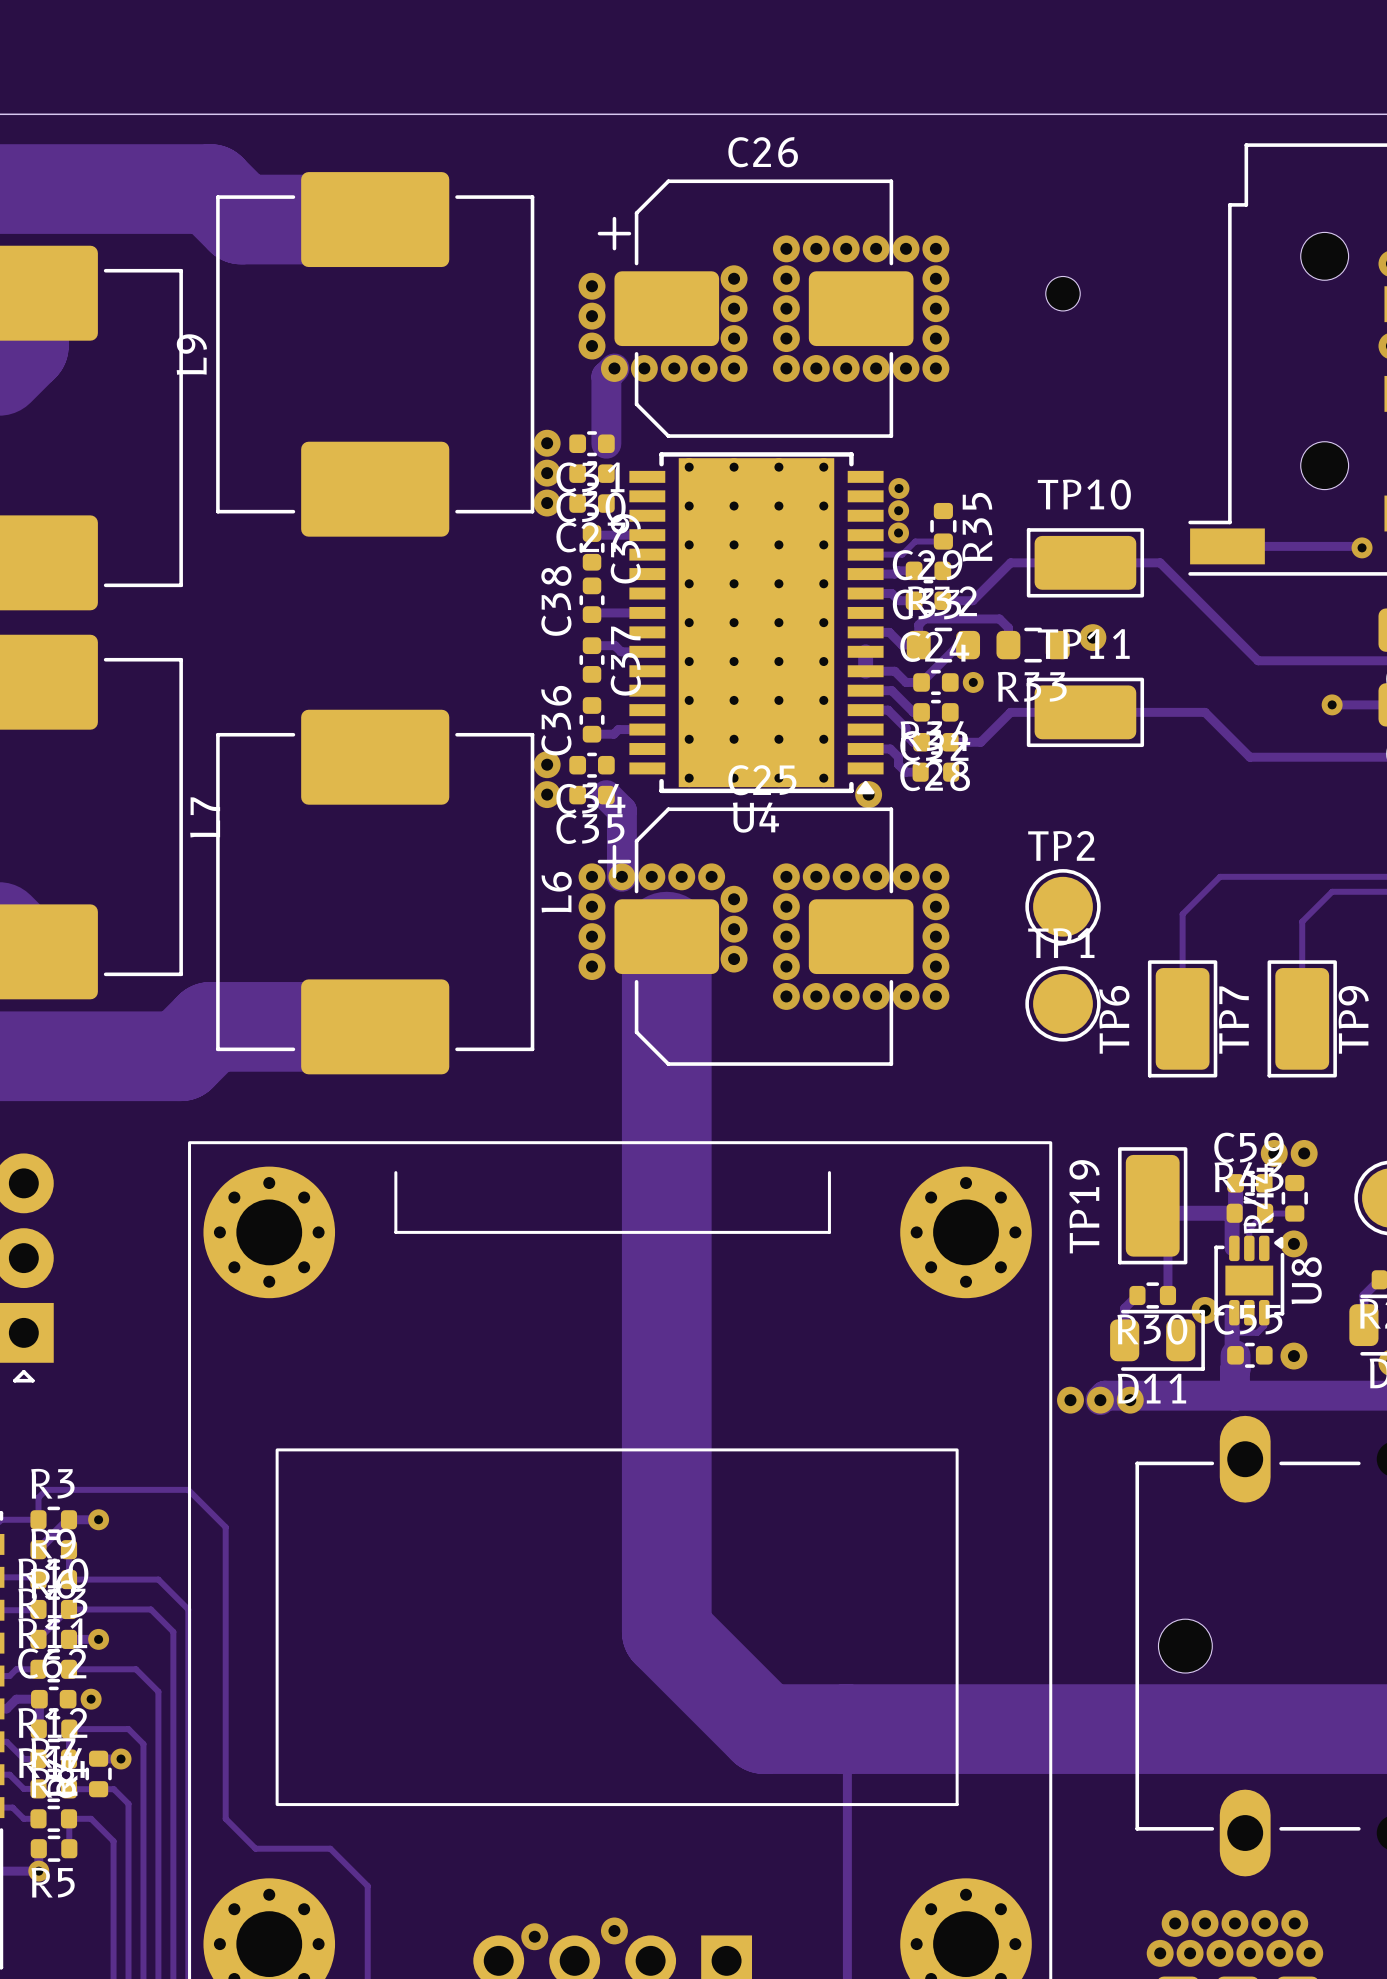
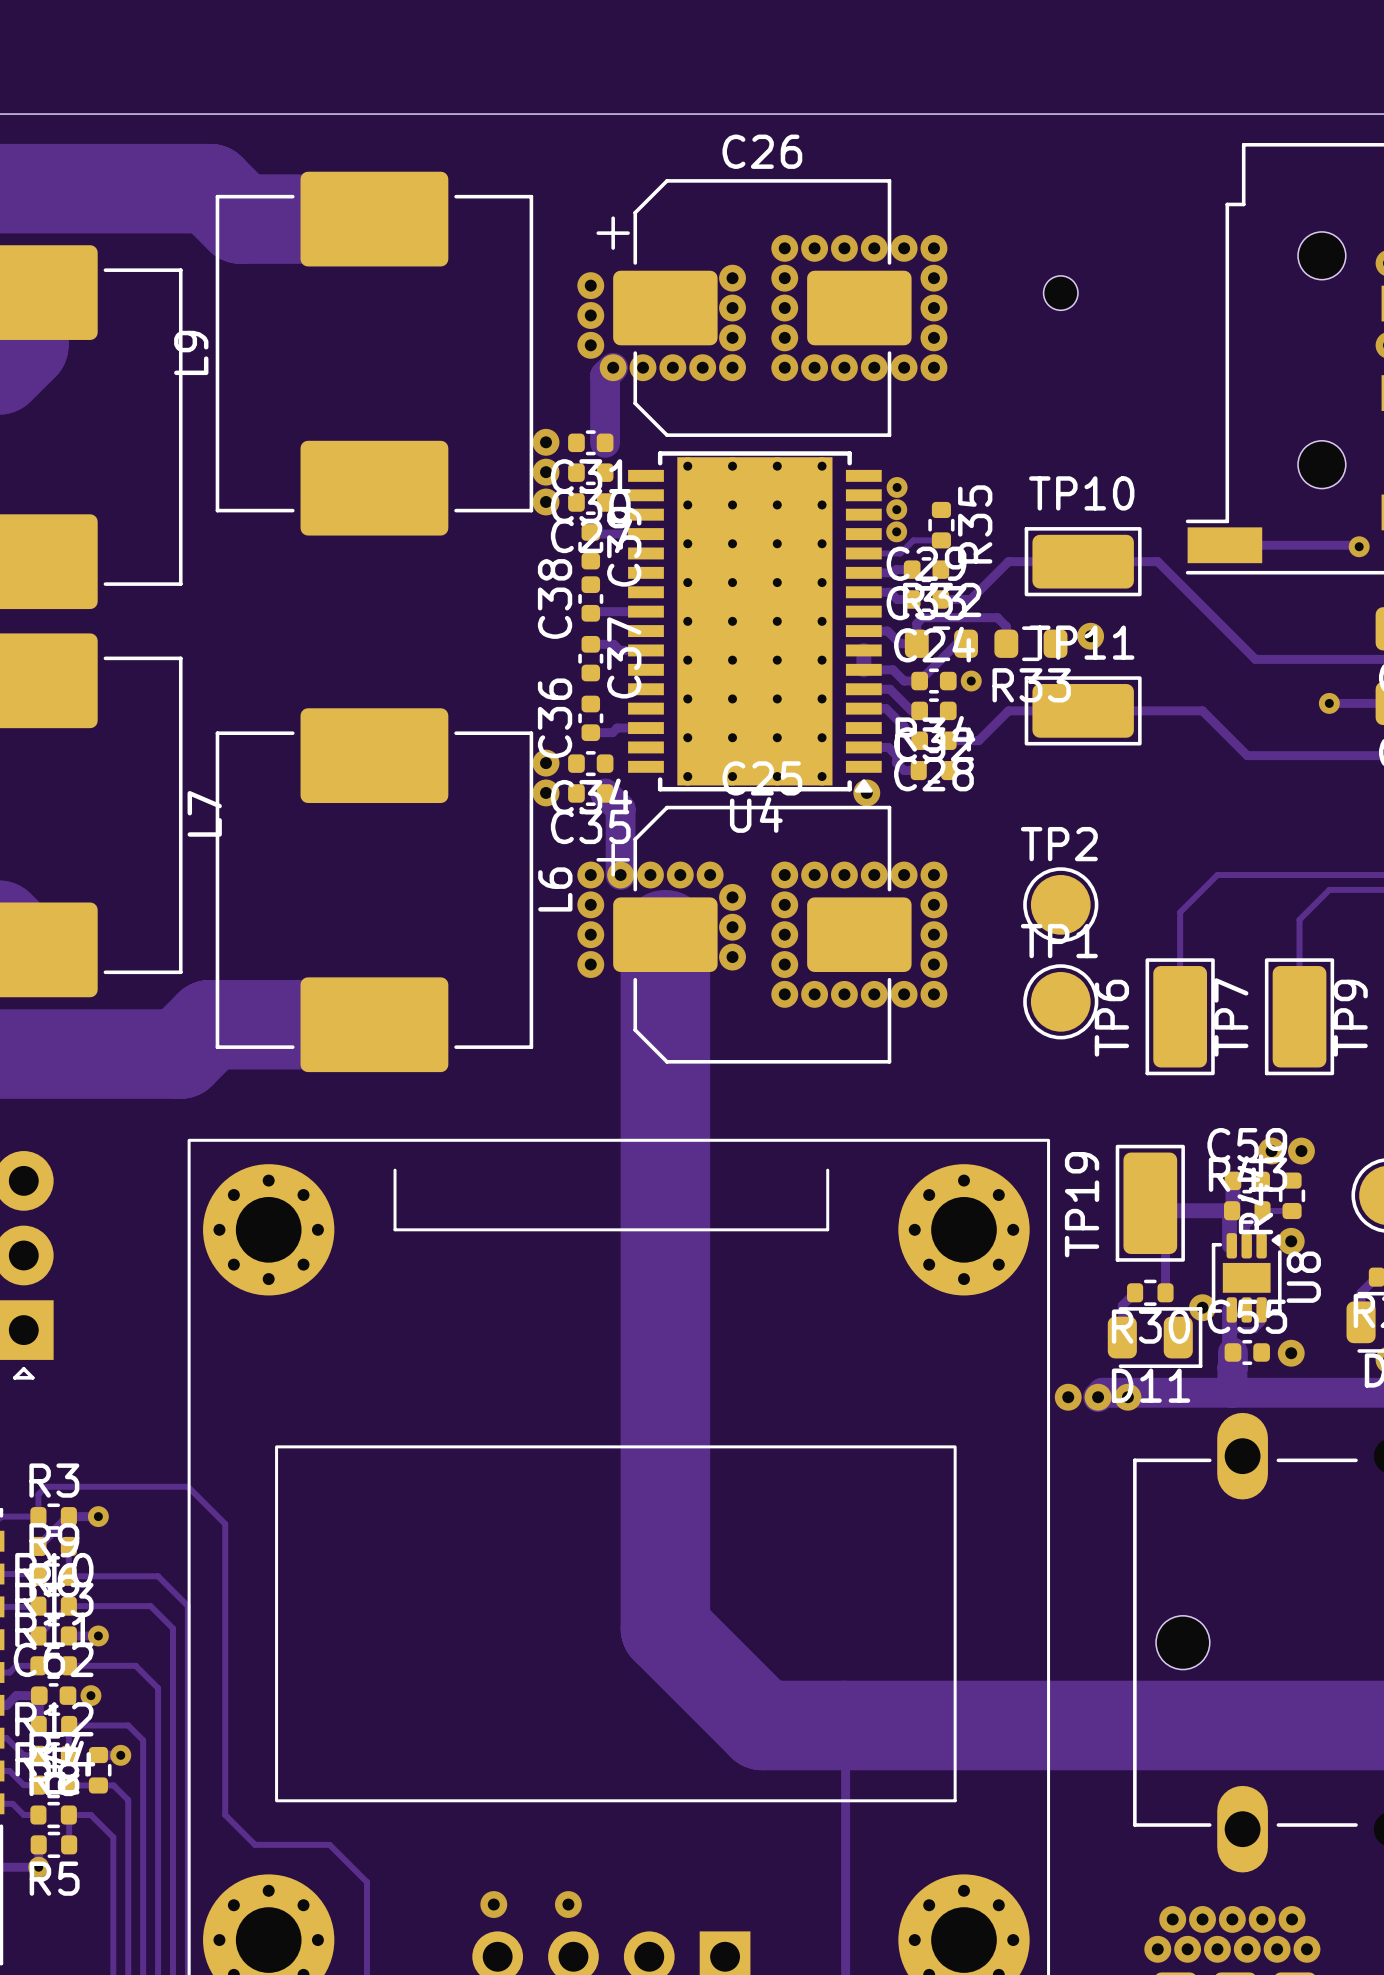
via: none -> (493, 1904)
via: none -> (568, 1904)
via: (614, 1930) -> none
via: (534, 1936) -> none

